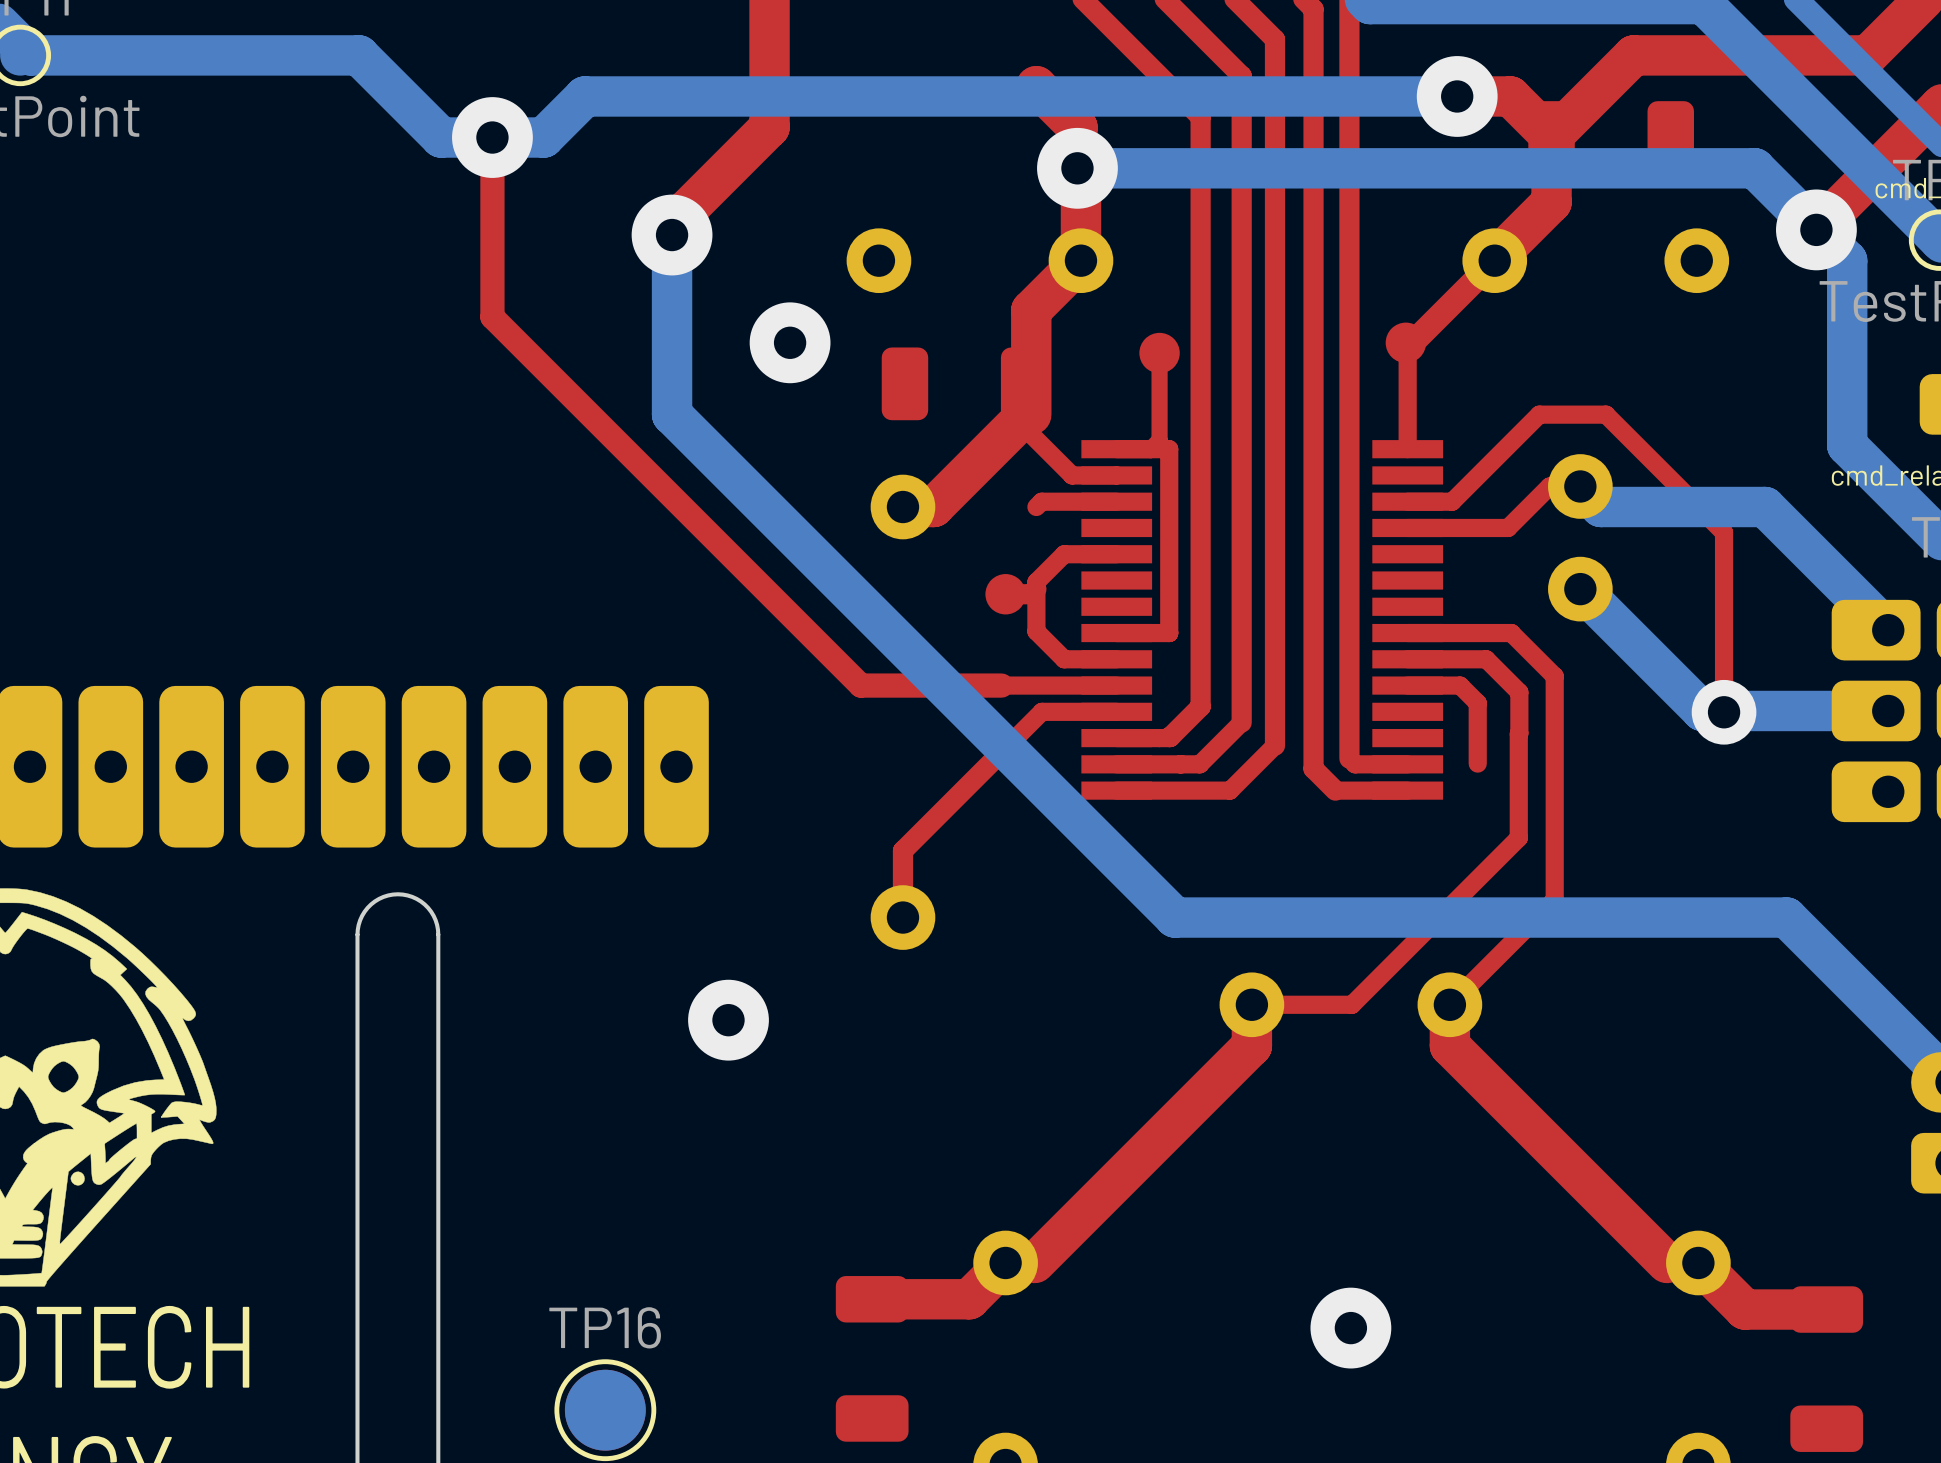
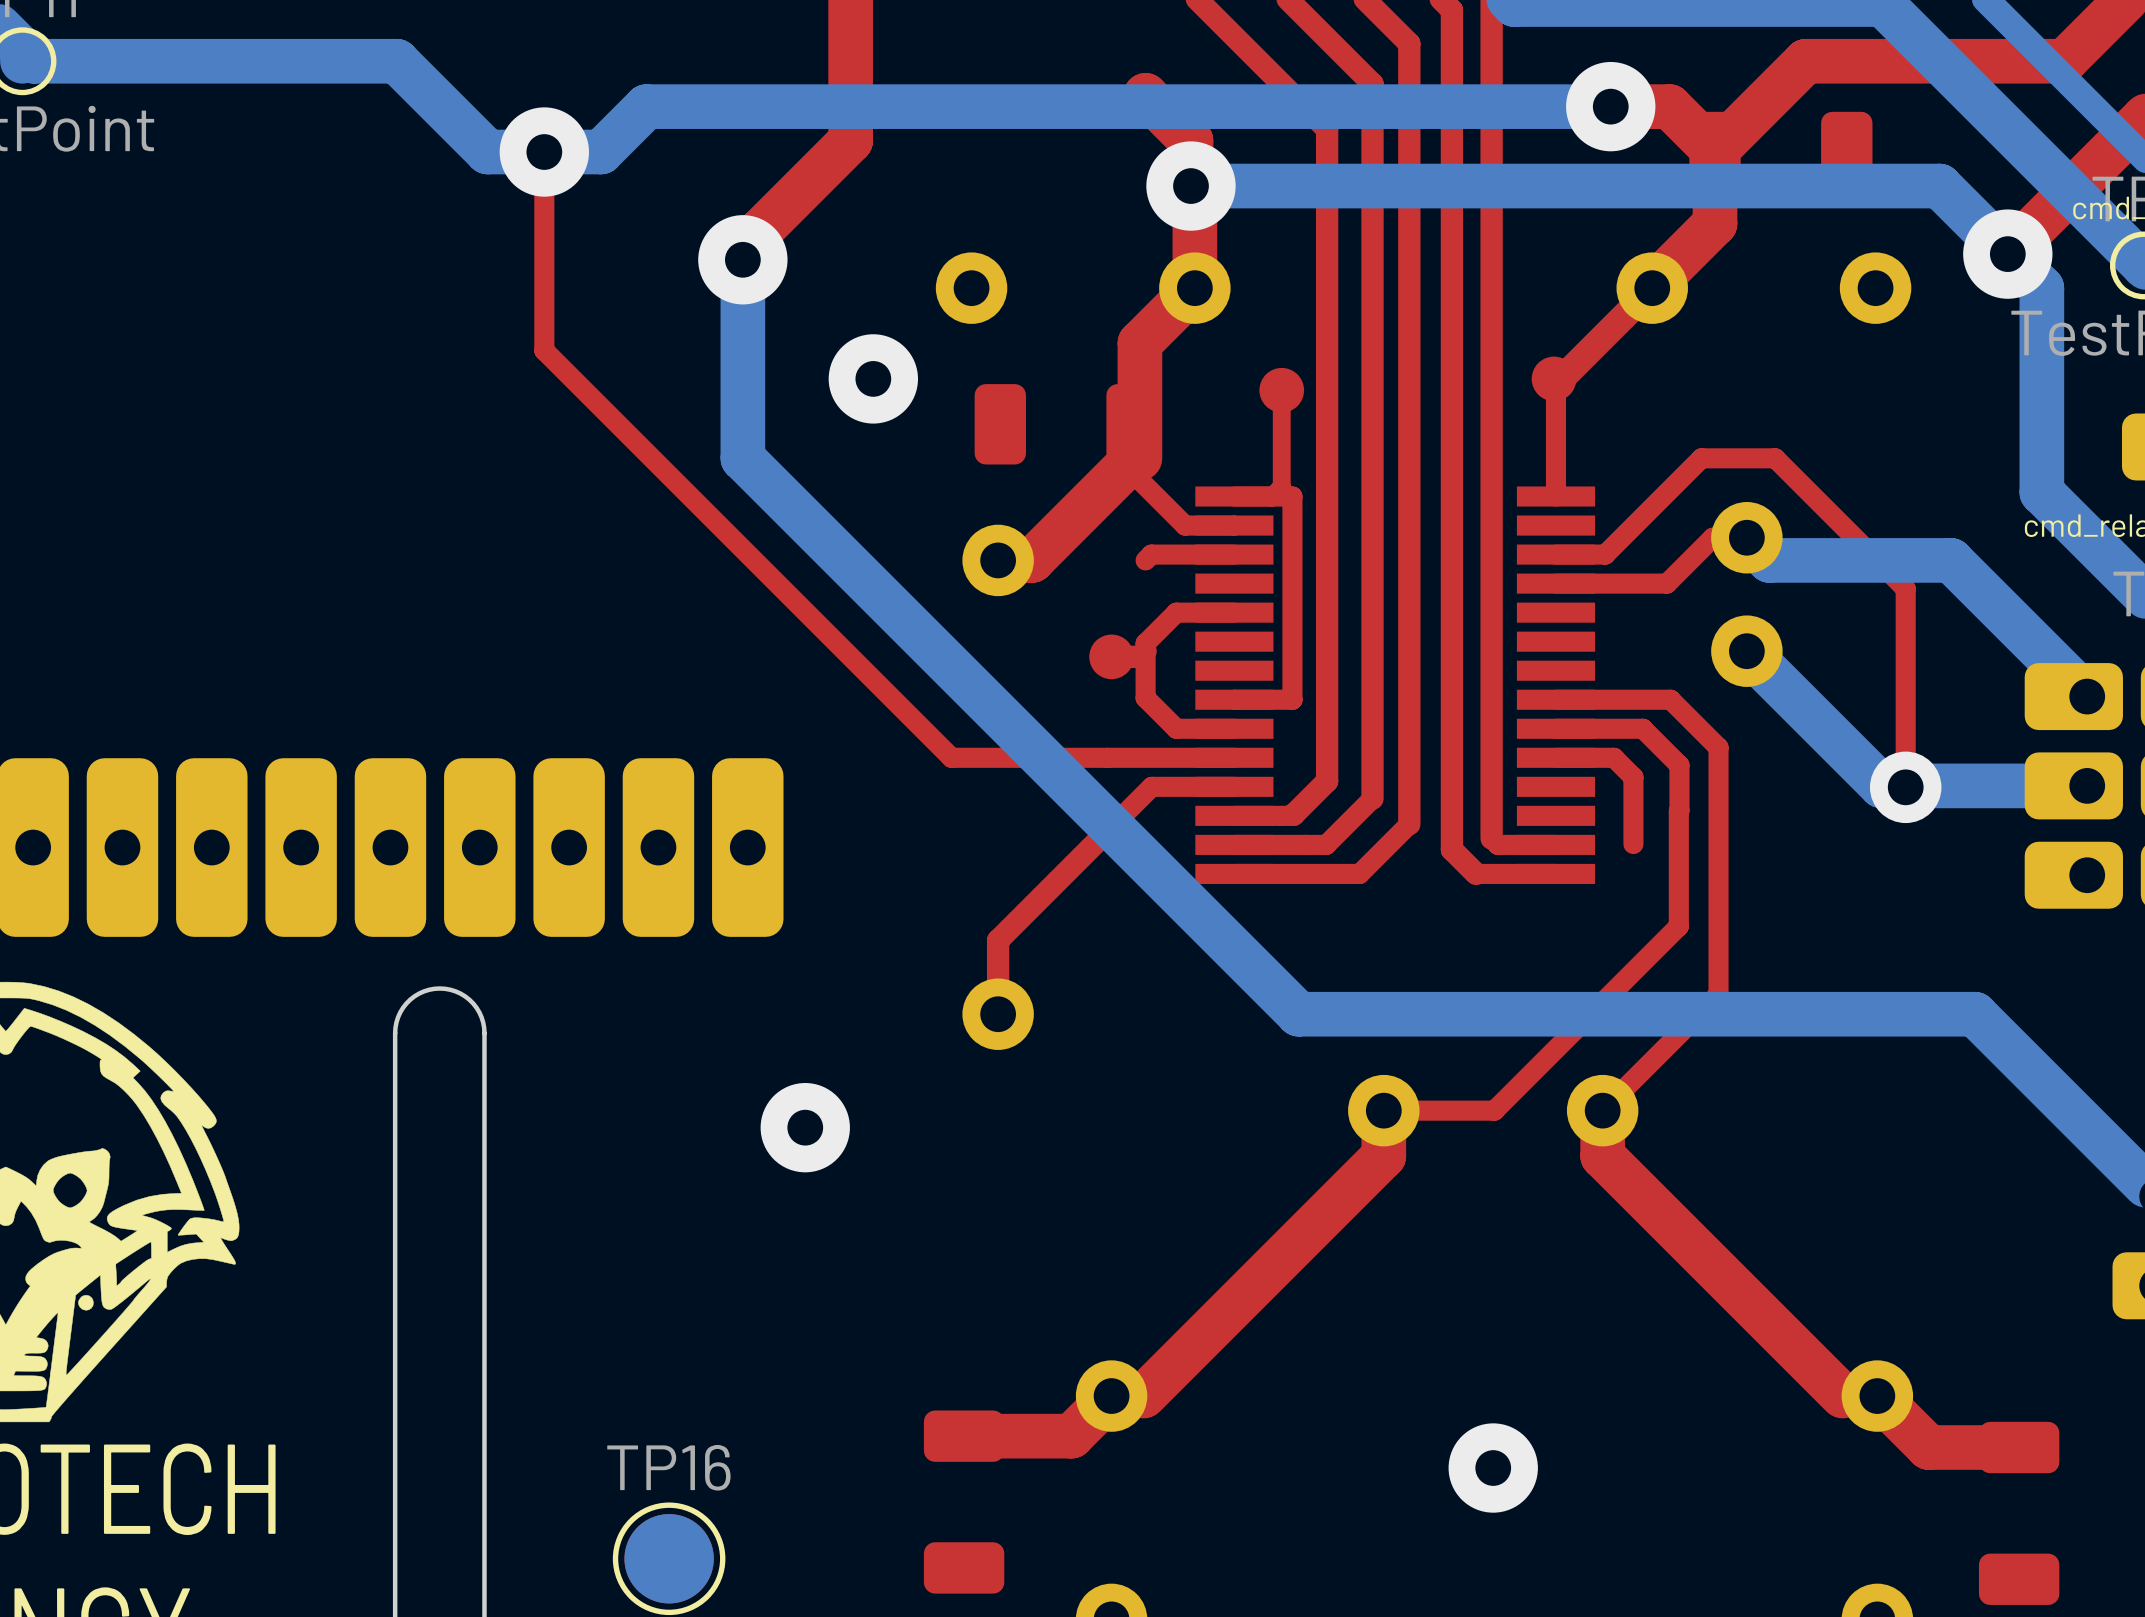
top track width: thick (492, 137) (492, 317) (860, 685) (1001, 685) -> thin (544, 152) (544, 350) (951, 757) (1107, 757)

